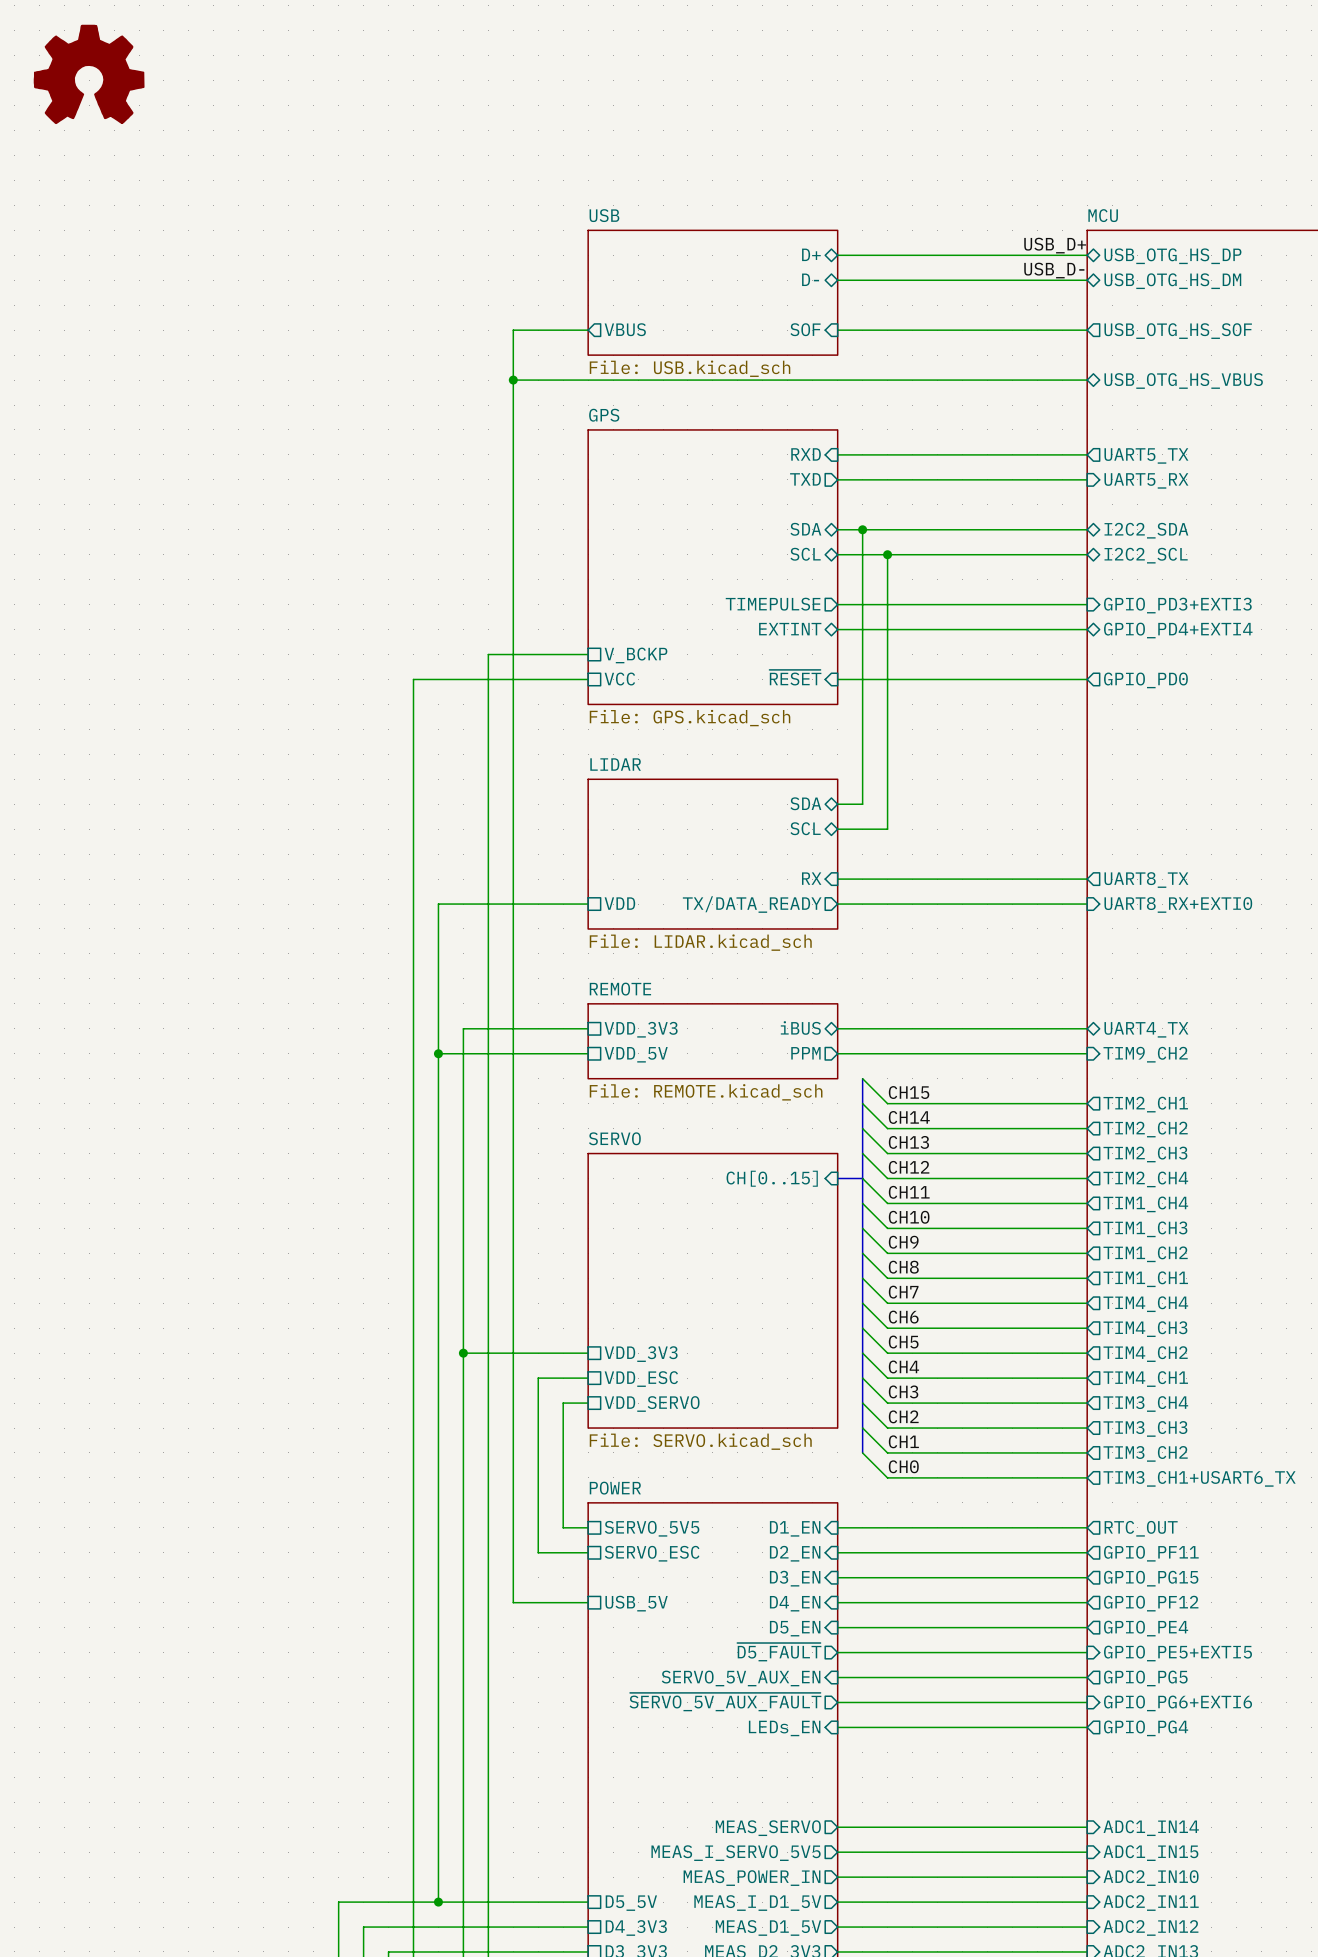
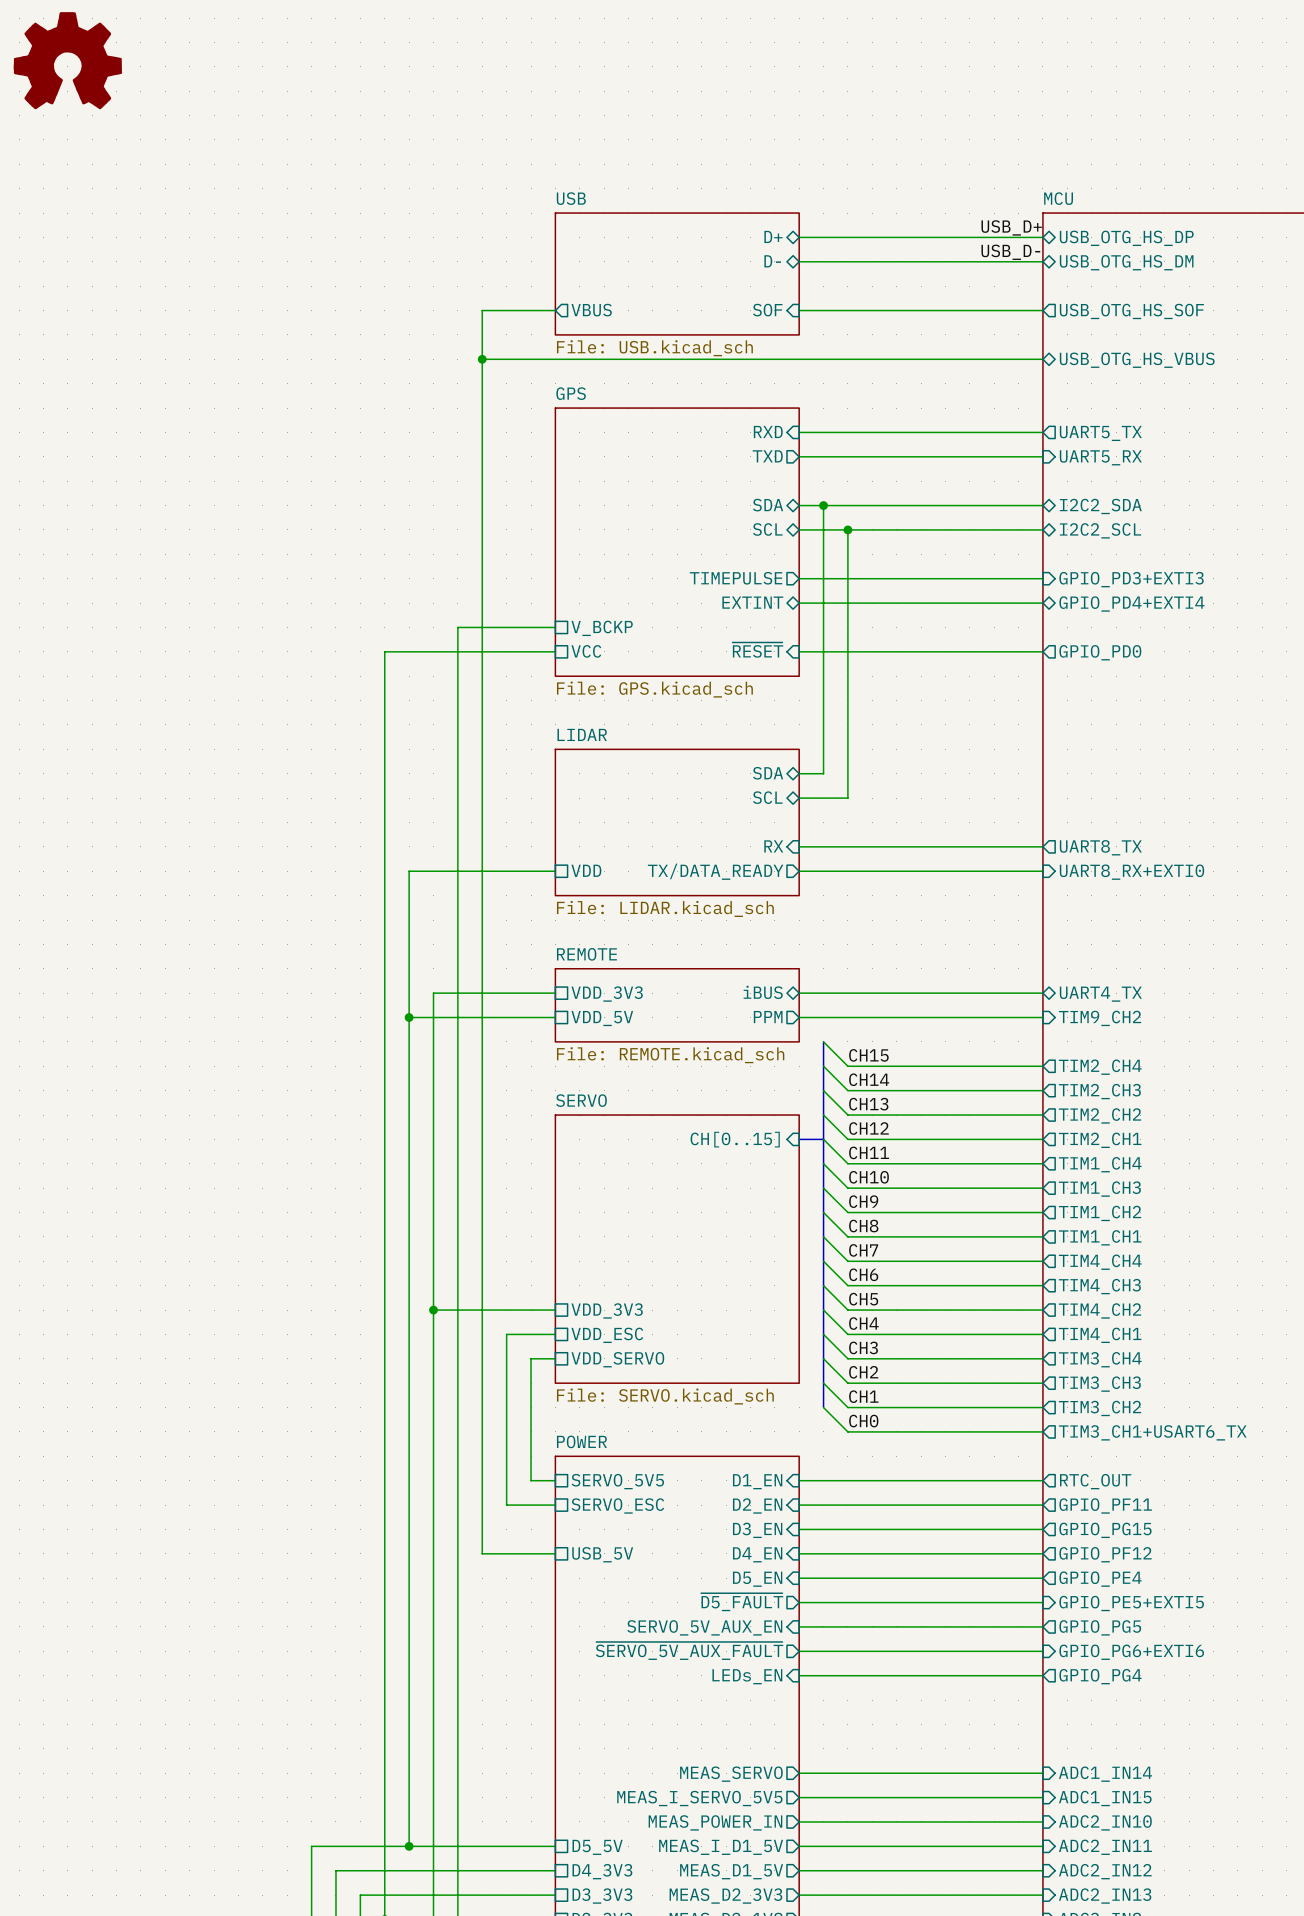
sheet pin: TIM2_CH1 (1145, 1104) -> TIM2_CH4 (1100, 1067)
sheet pin: TIM2_CH2 (1145, 1129) -> TIM2_CH3 (1099, 1091)
sheet pin: TIM2_CH3 (1145, 1154) -> TIM2_CH2 (1100, 1115)
sheet pin: TIM2_CH4 (1145, 1179) -> TIM2_CH1 (1100, 1140)

